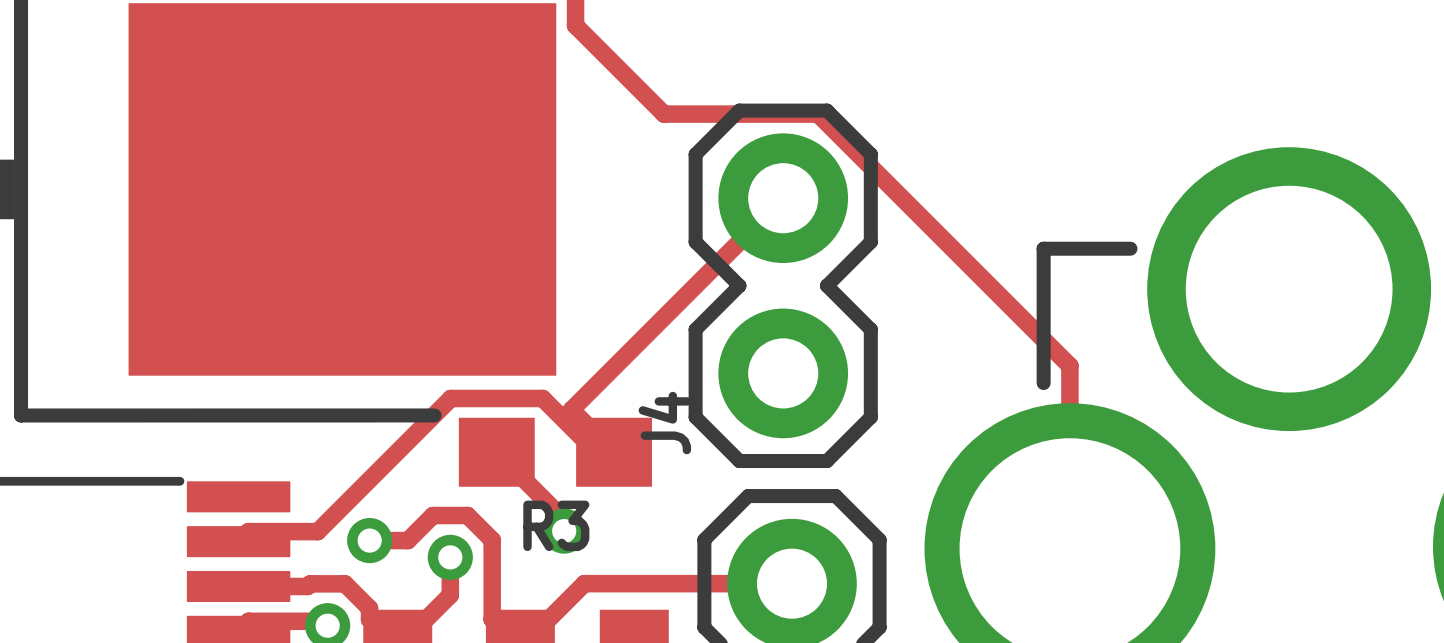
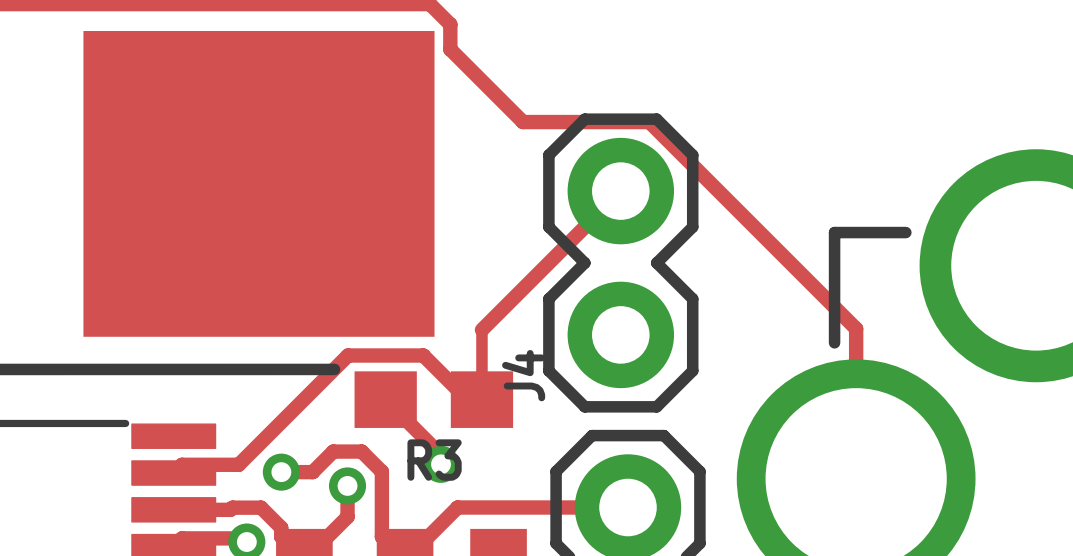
track: (614, 367) (571, 409) (614, 452) -> (481, 329) (481, 399)

